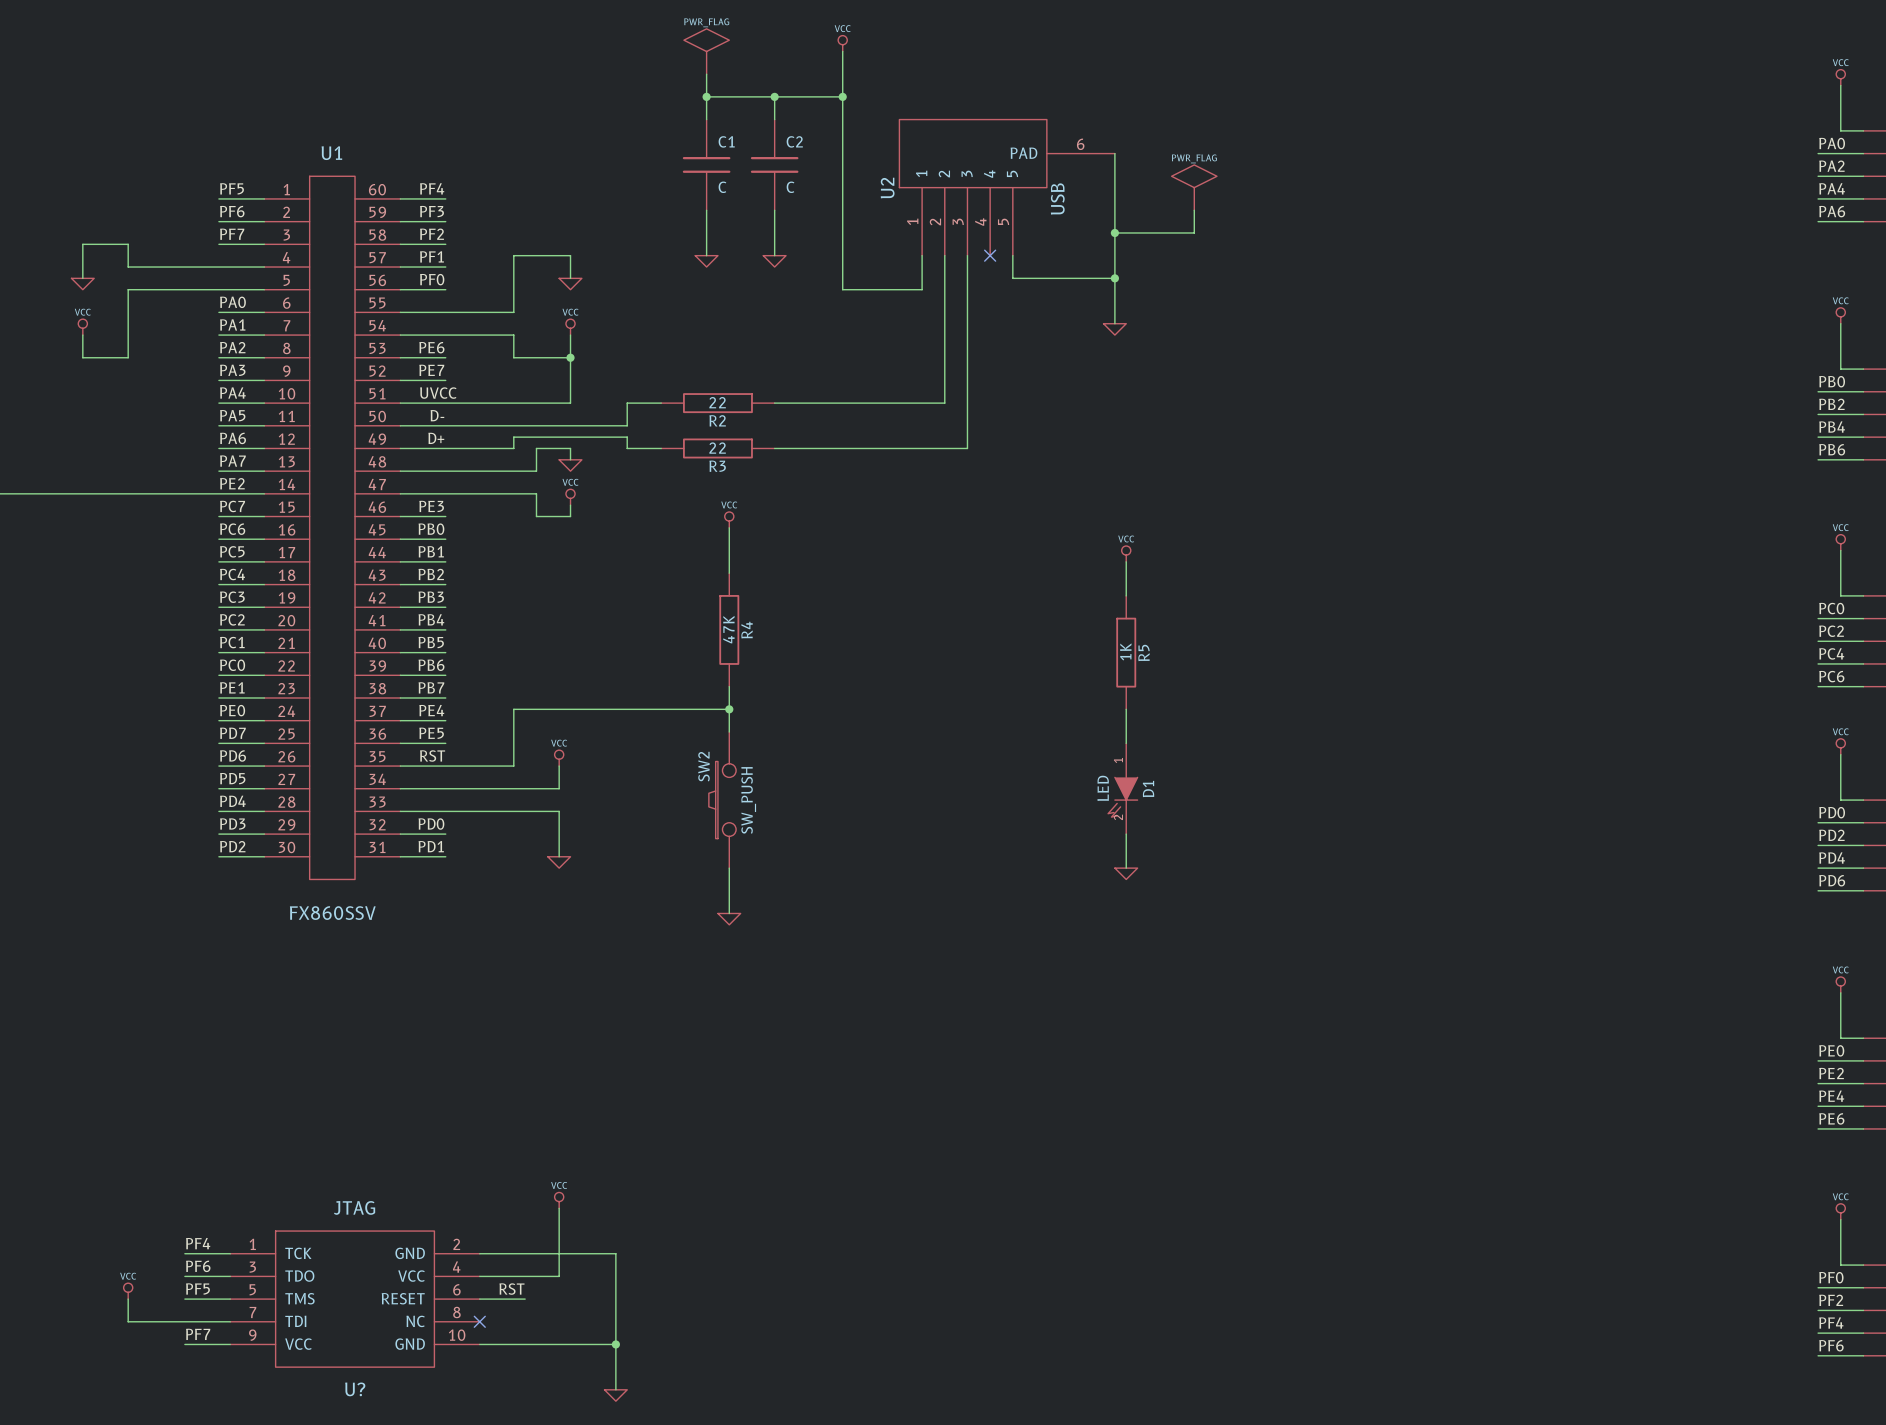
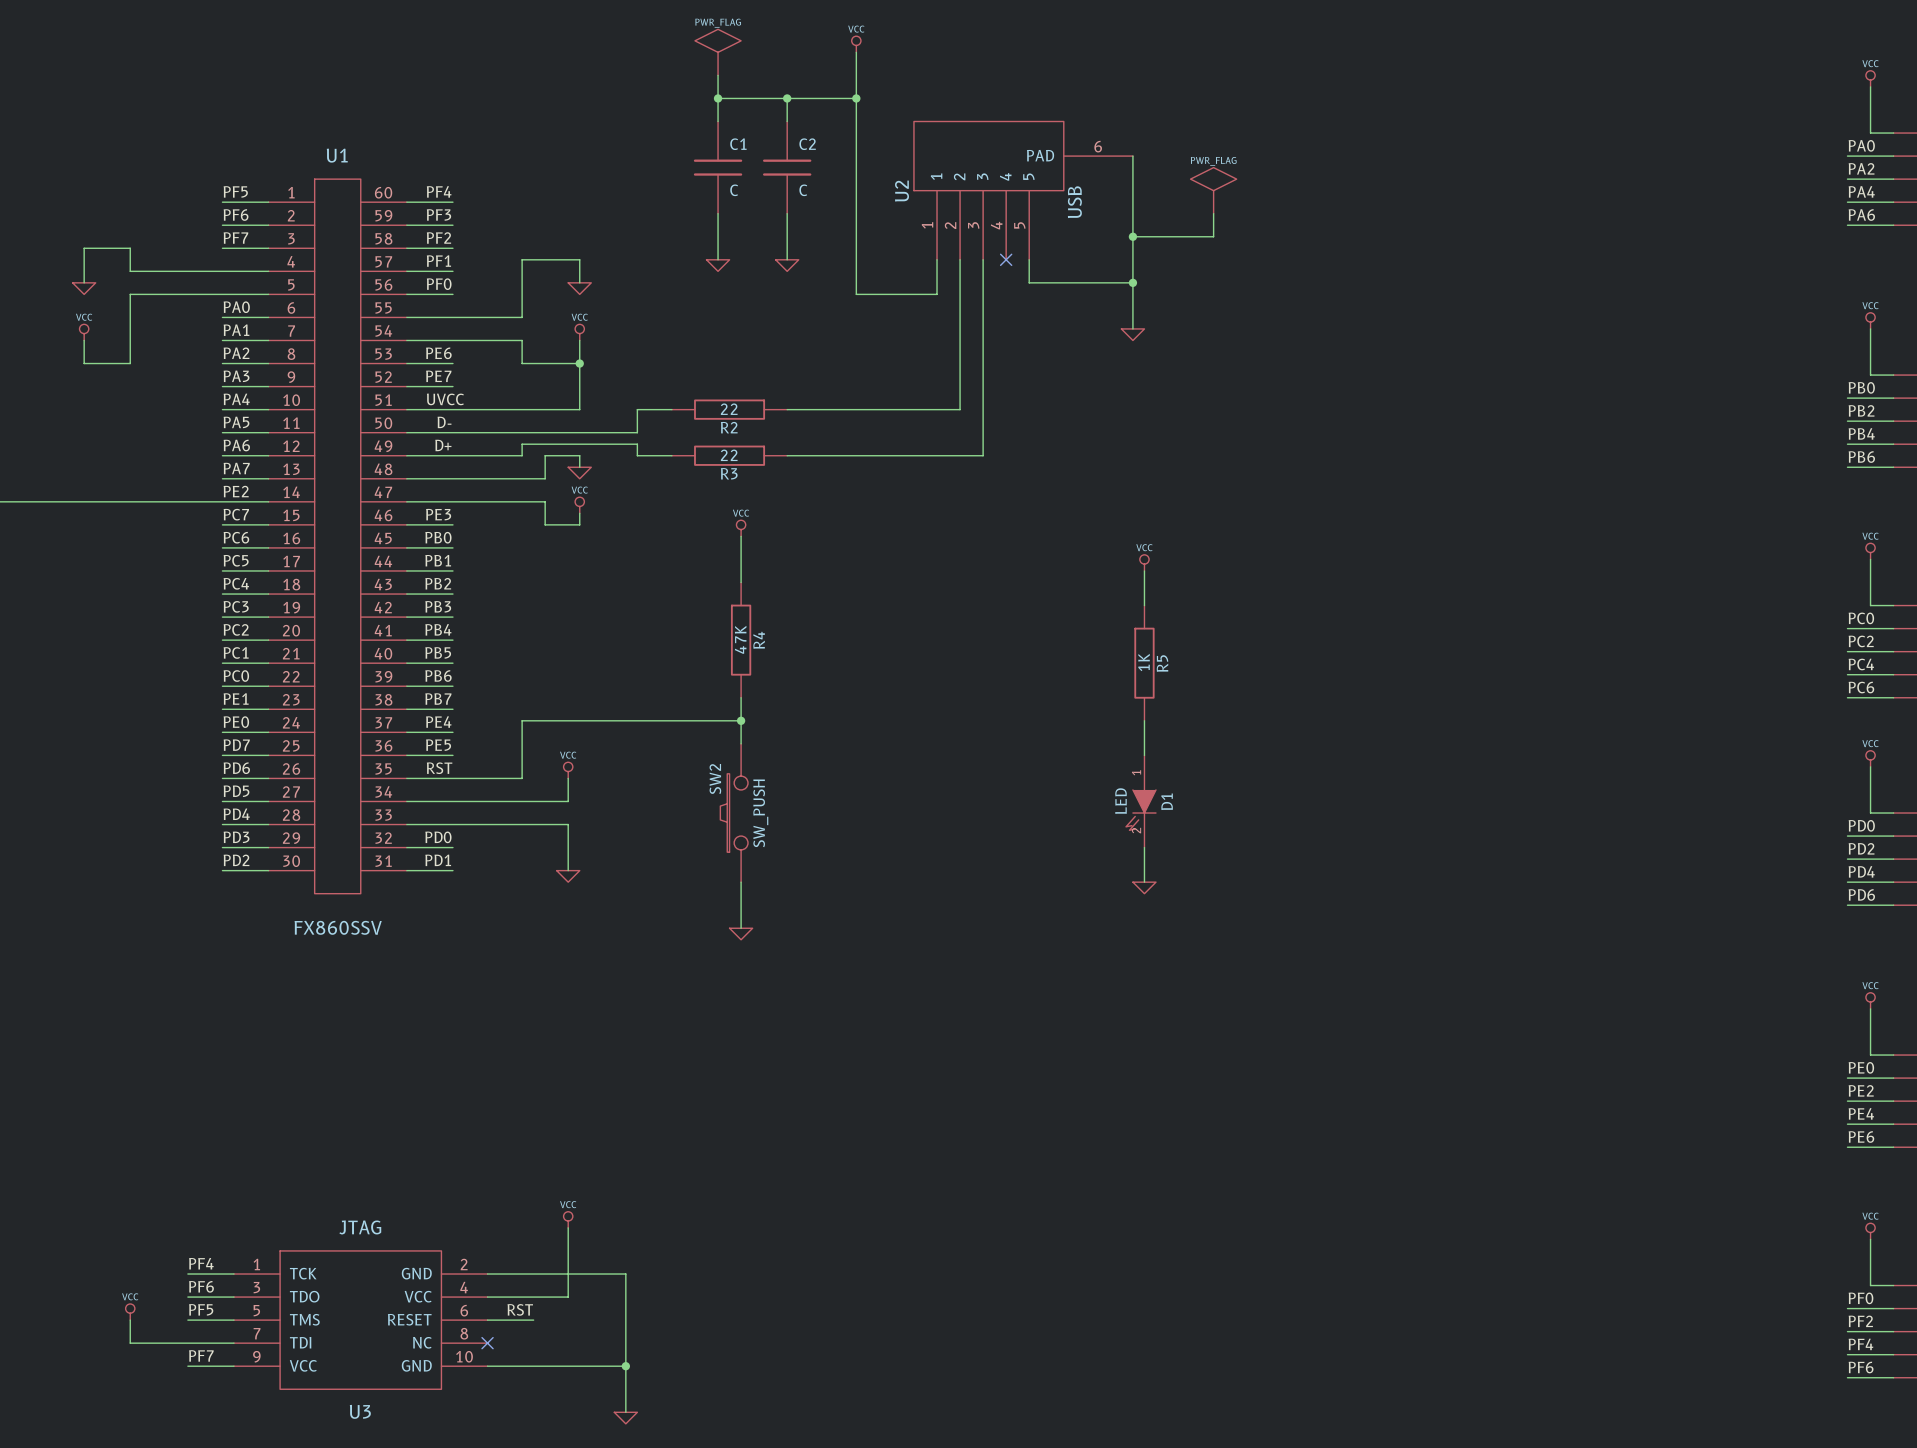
U? name: U? (355, 1389) -> U3 (360, 1411)

